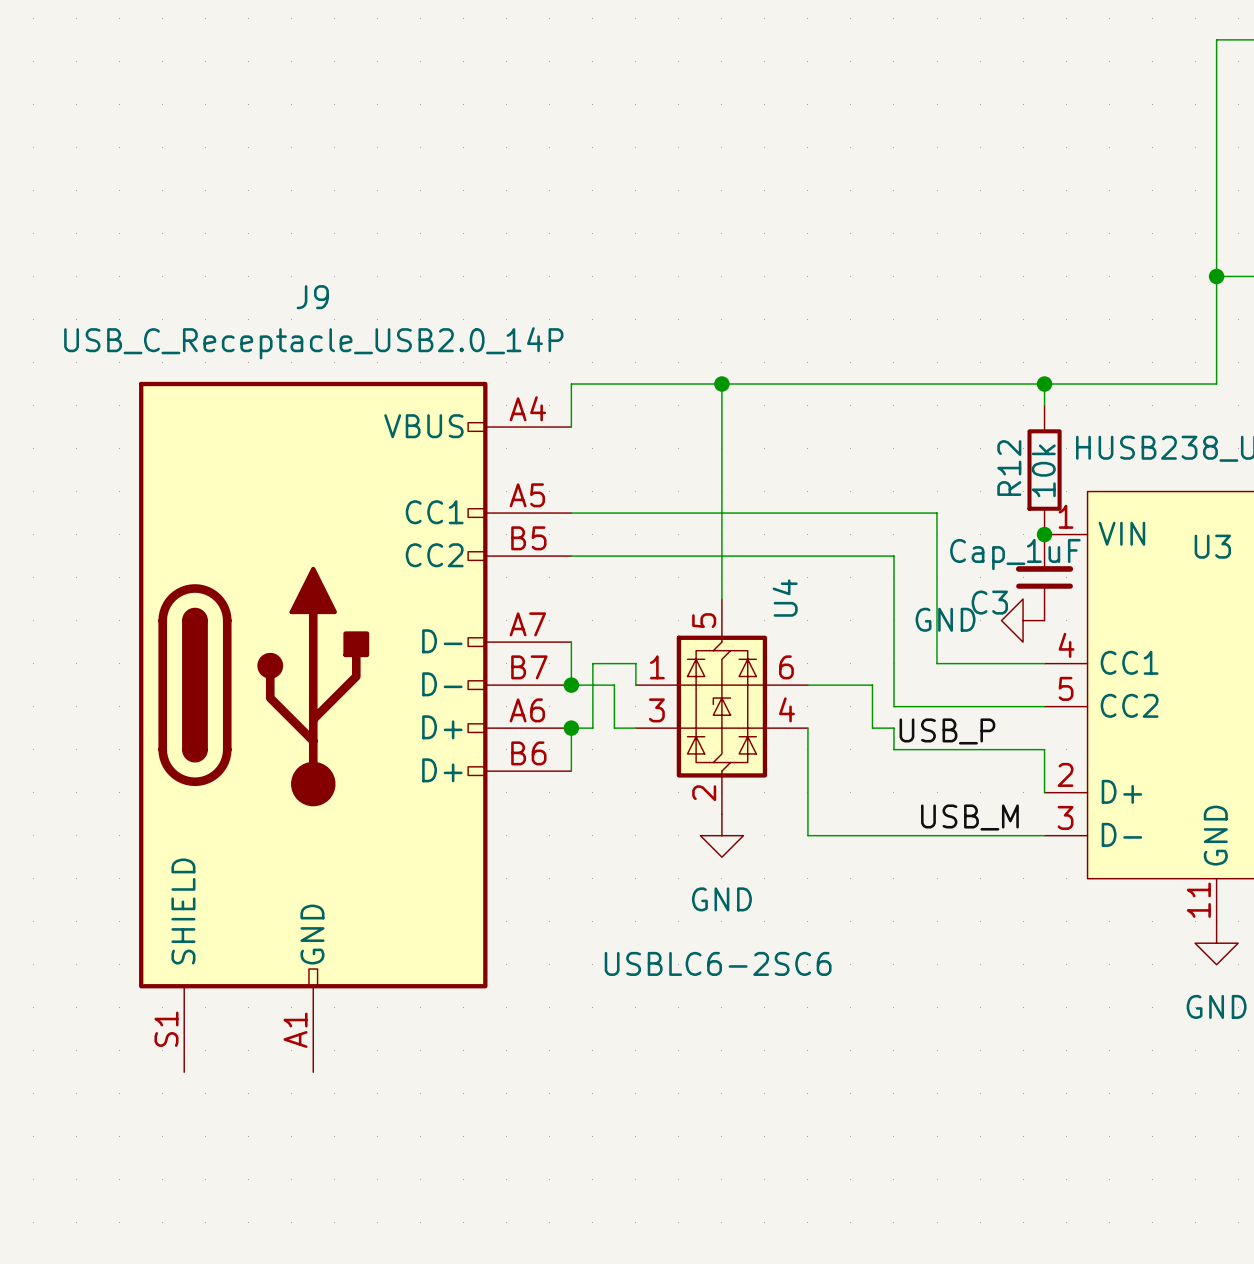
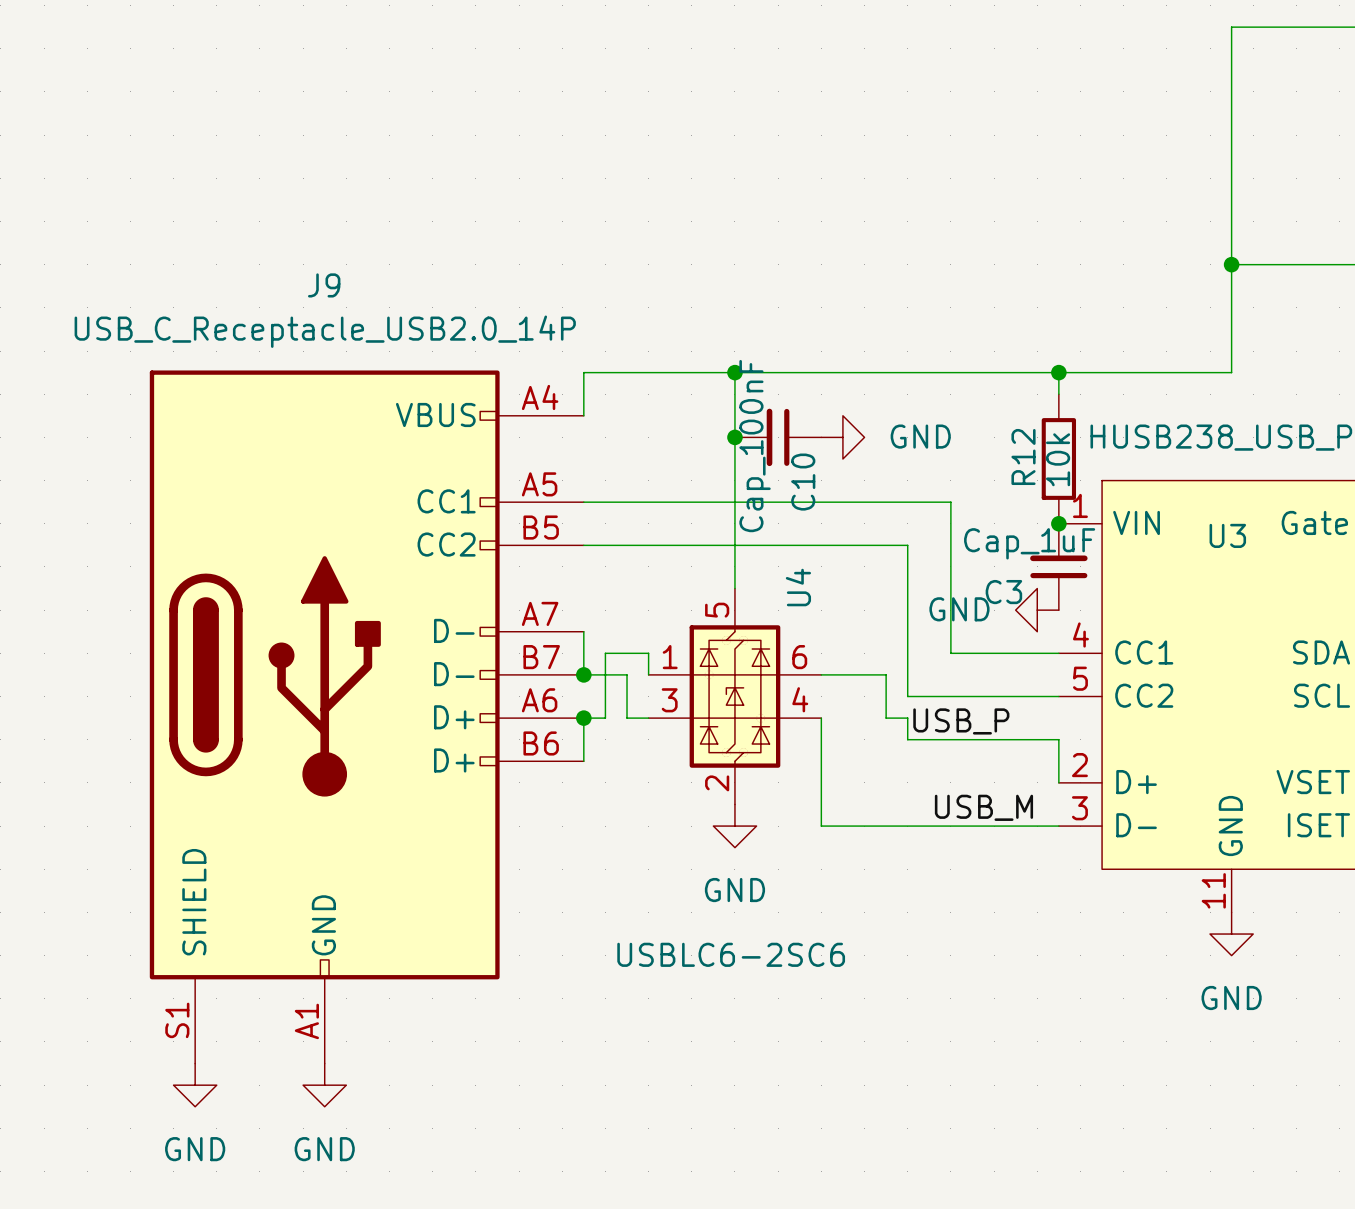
junction: none -> (734, 437)
C10: none -> Cap_100nF (778, 437)
power symbol: none -> GND (842, 437)
power symbol: none -> GND (195, 1085)
power symbol: none -> GND (324, 1085)

